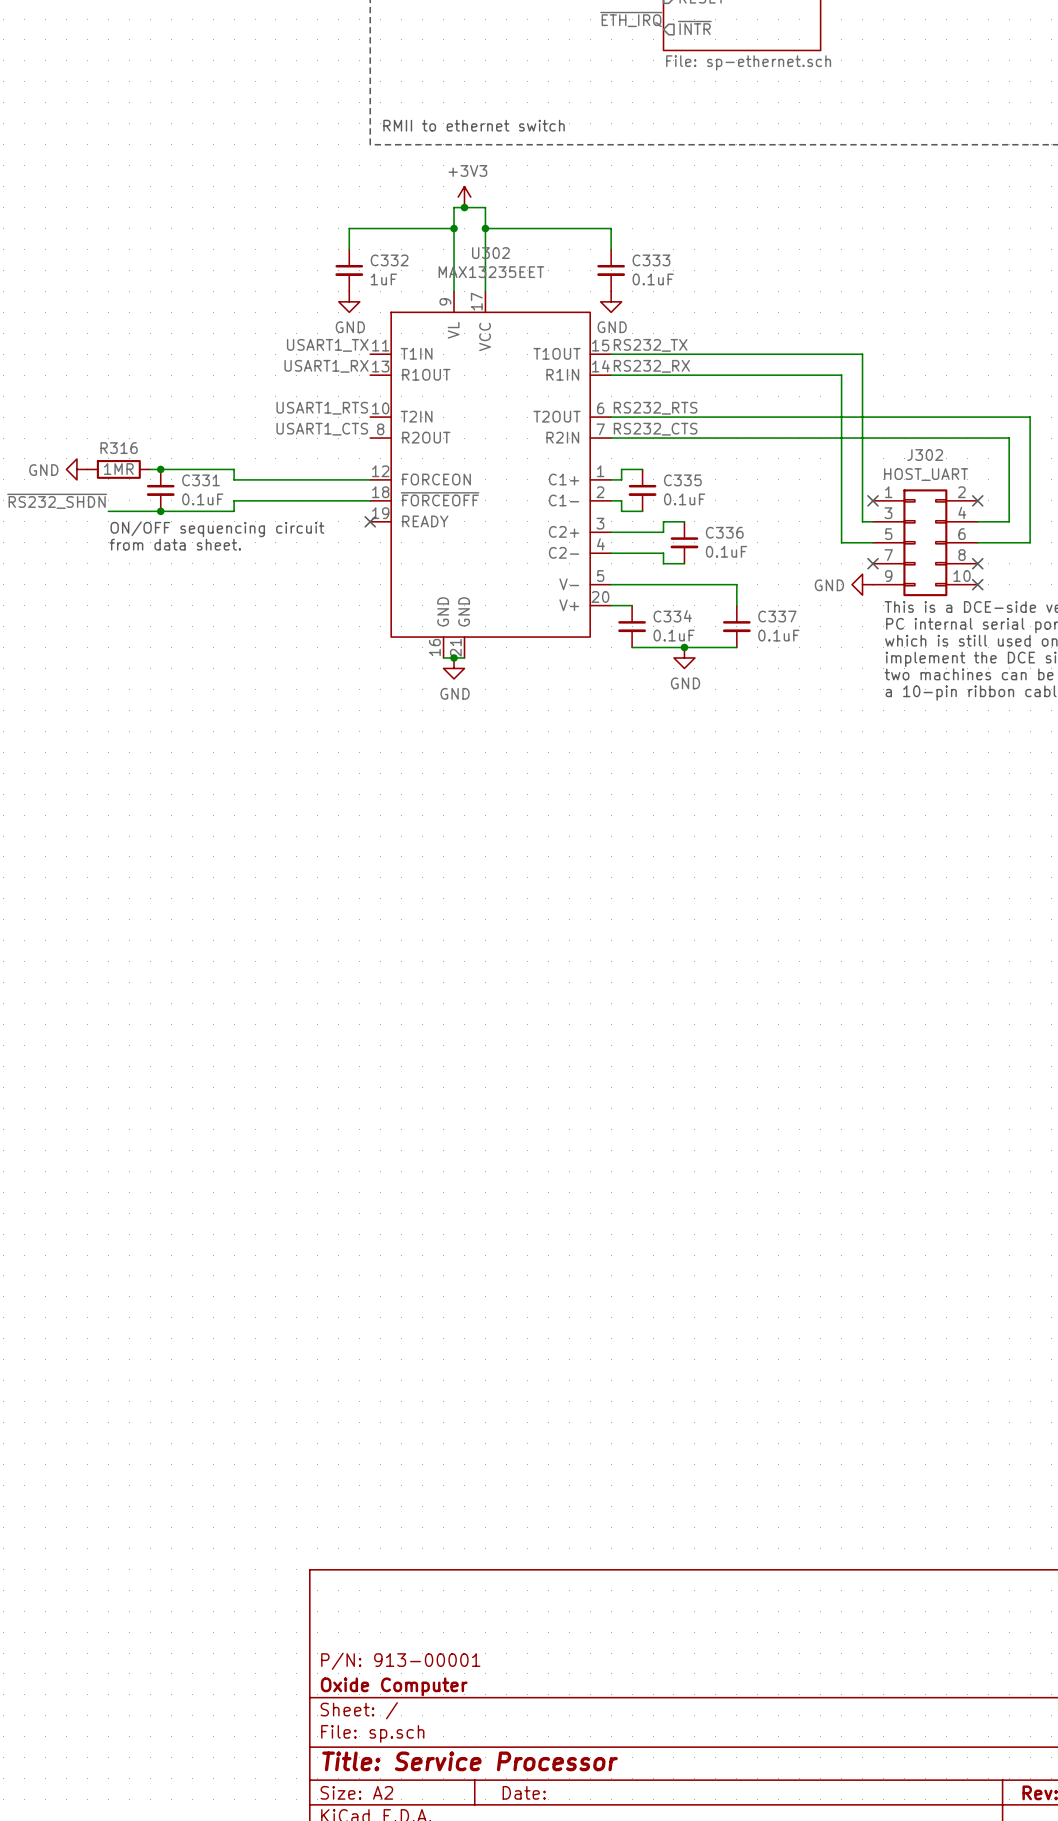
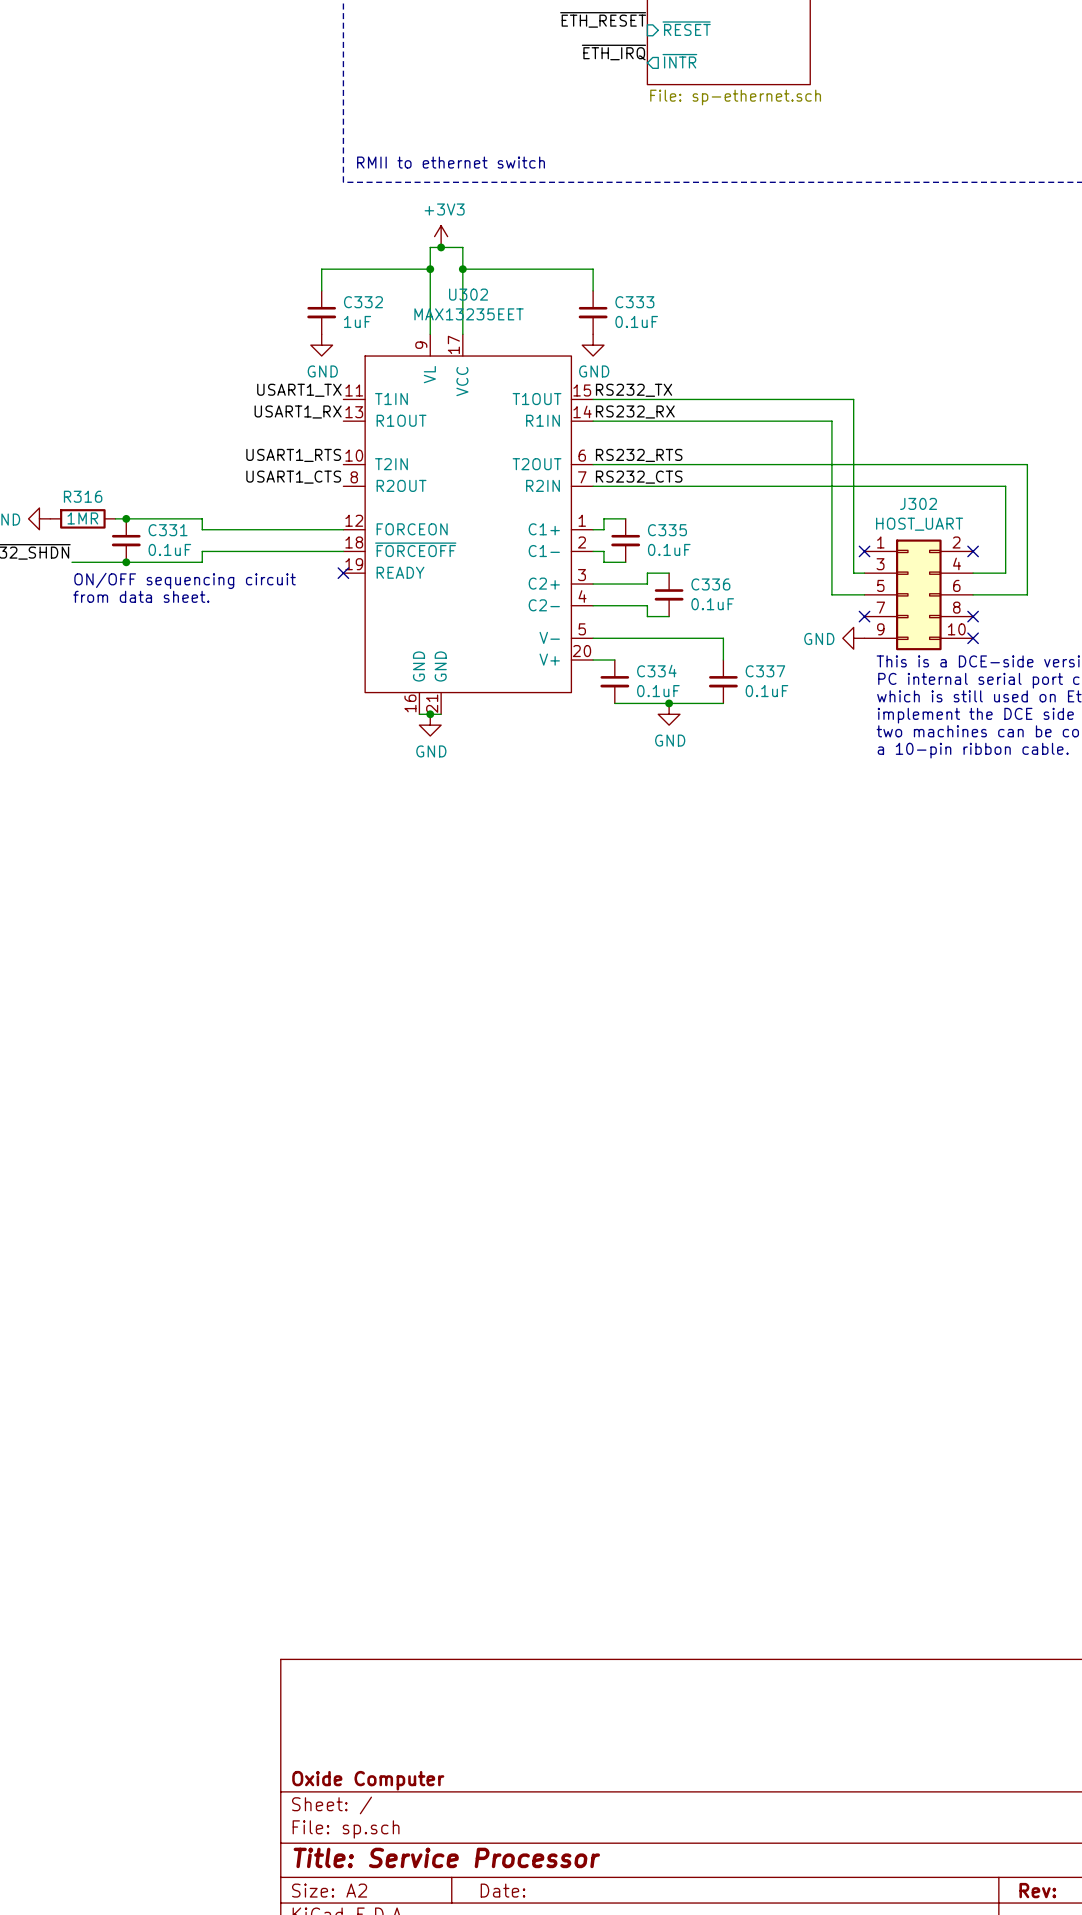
title block: P/N: 913-00001 (400, 1661) -> none

